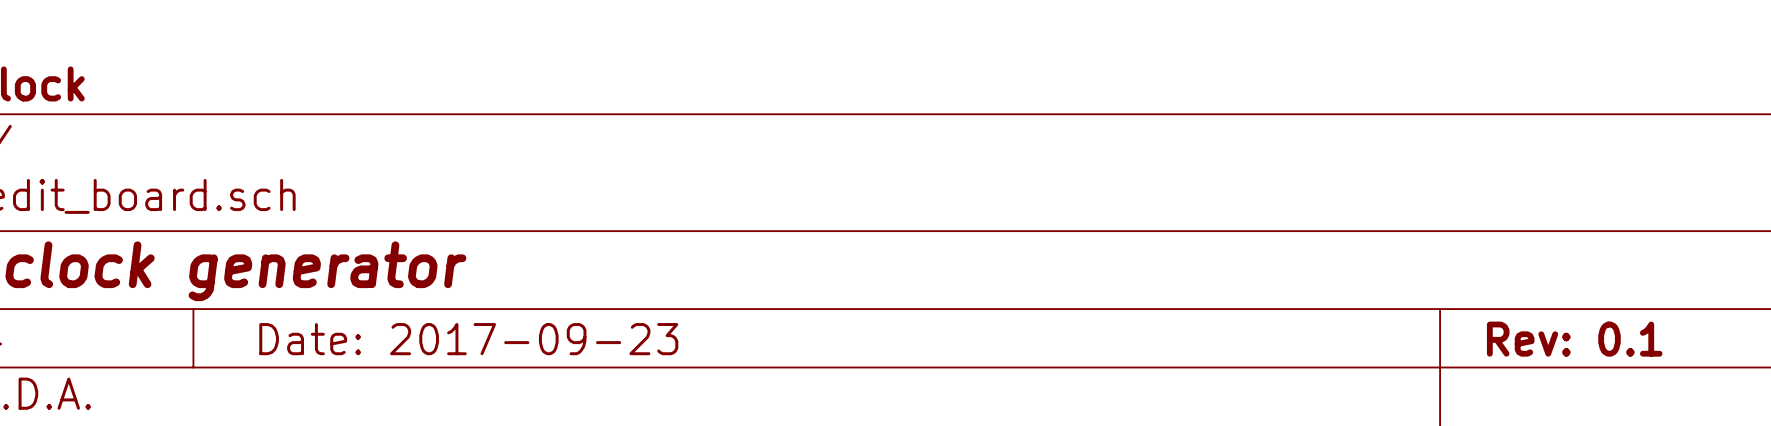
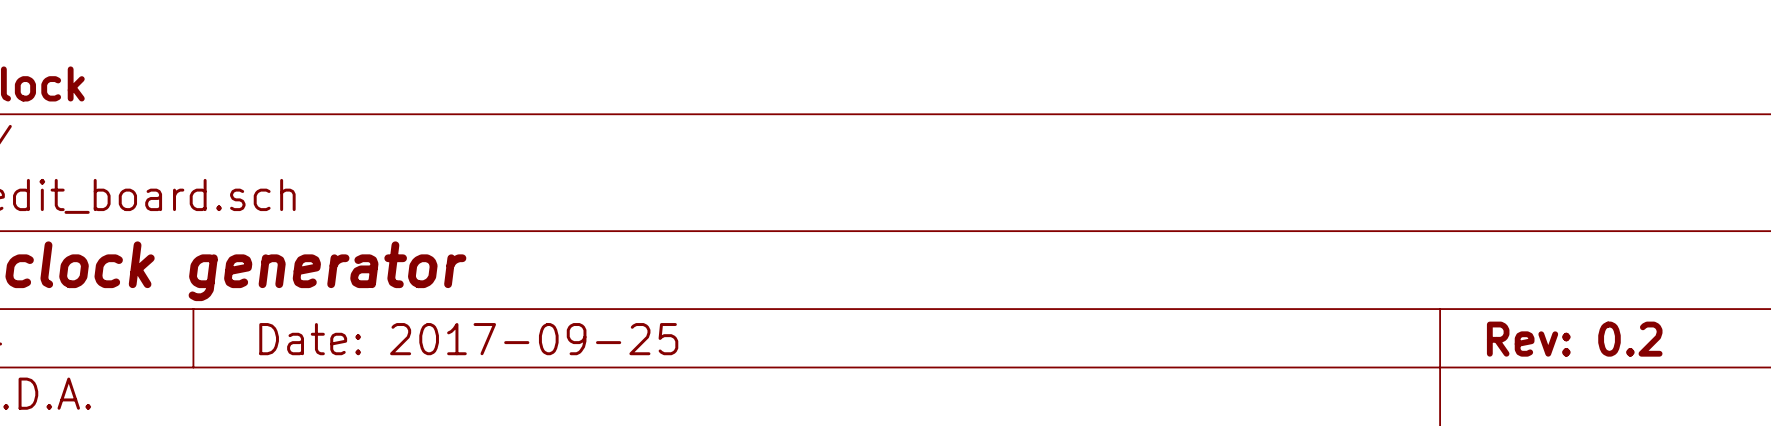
title block: Date: 2017-09-23 (468, 339) -> Date: 2017-09-25 (468, 339)
title block: Rev: 0.1 (1574, 339) -> Rev: 0.2 (1574, 339)

